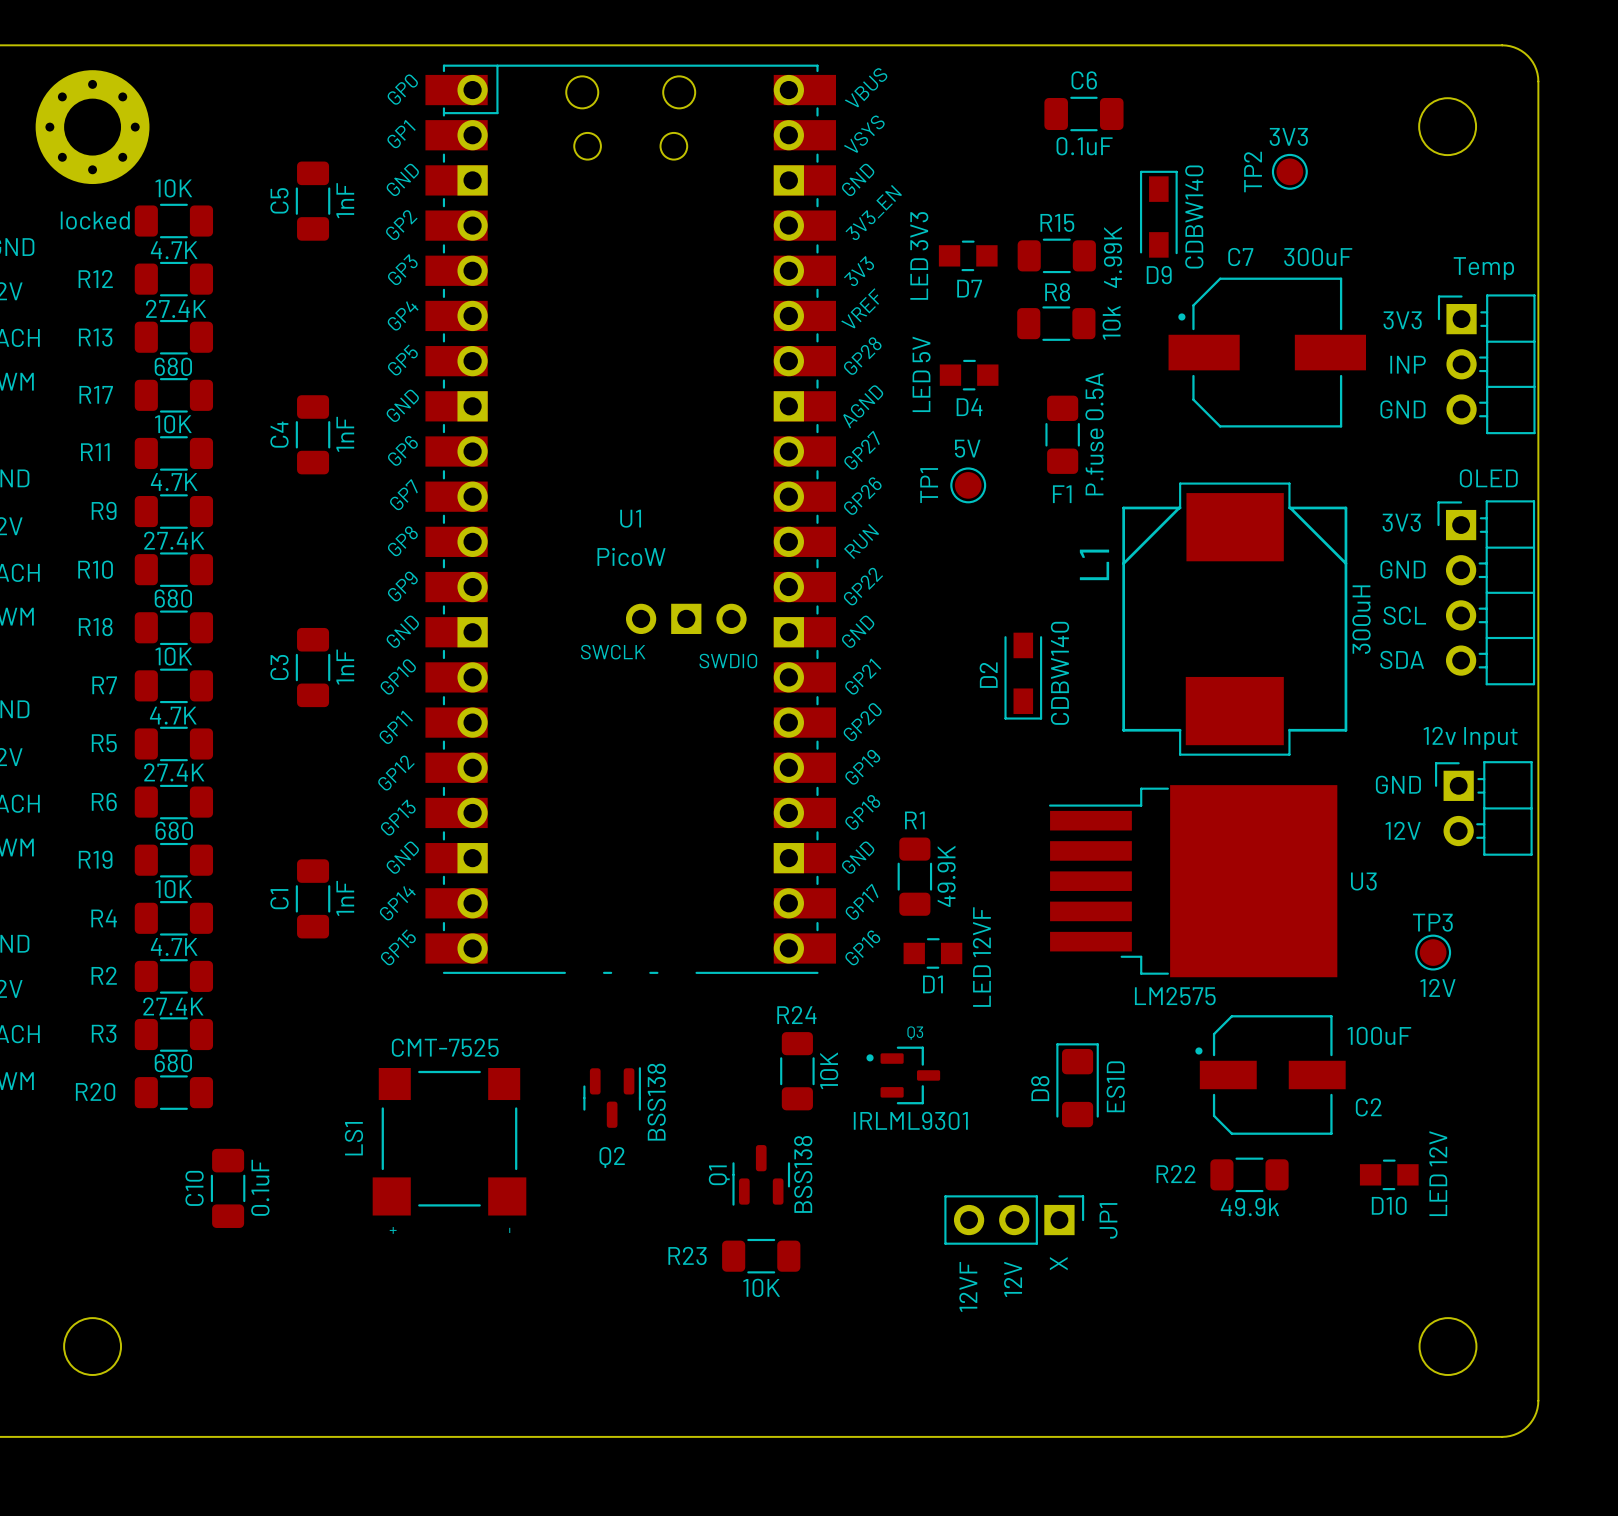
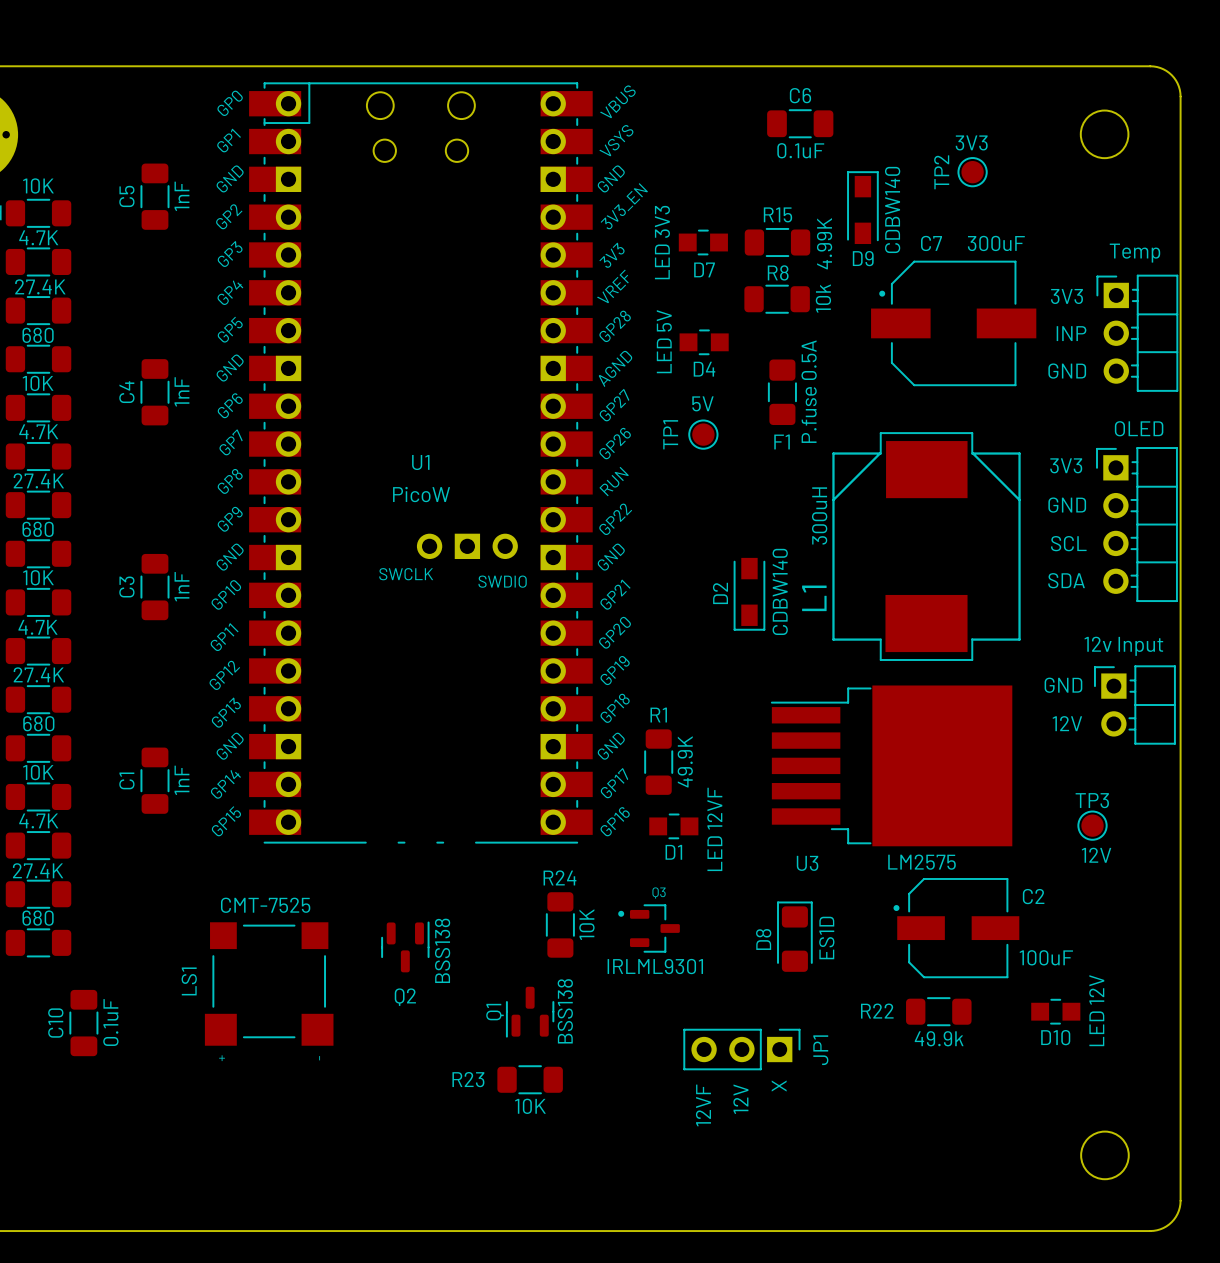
L1 name position: L1 (1094, 564) -> L1 (814, 598)
L1 value position: 300uH (1361, 619) -> 300uH (819, 515)
U3 name position: U3 (1363, 881) -> U3 (807, 863)
U3 value position: LM2575 (1175, 996) -> LM2575 (922, 862)
C2 value position: 100uF (1379, 1035) -> 100uF (1046, 957)
C2 name position: C2 (1368, 1107) -> C2 (1033, 896)

